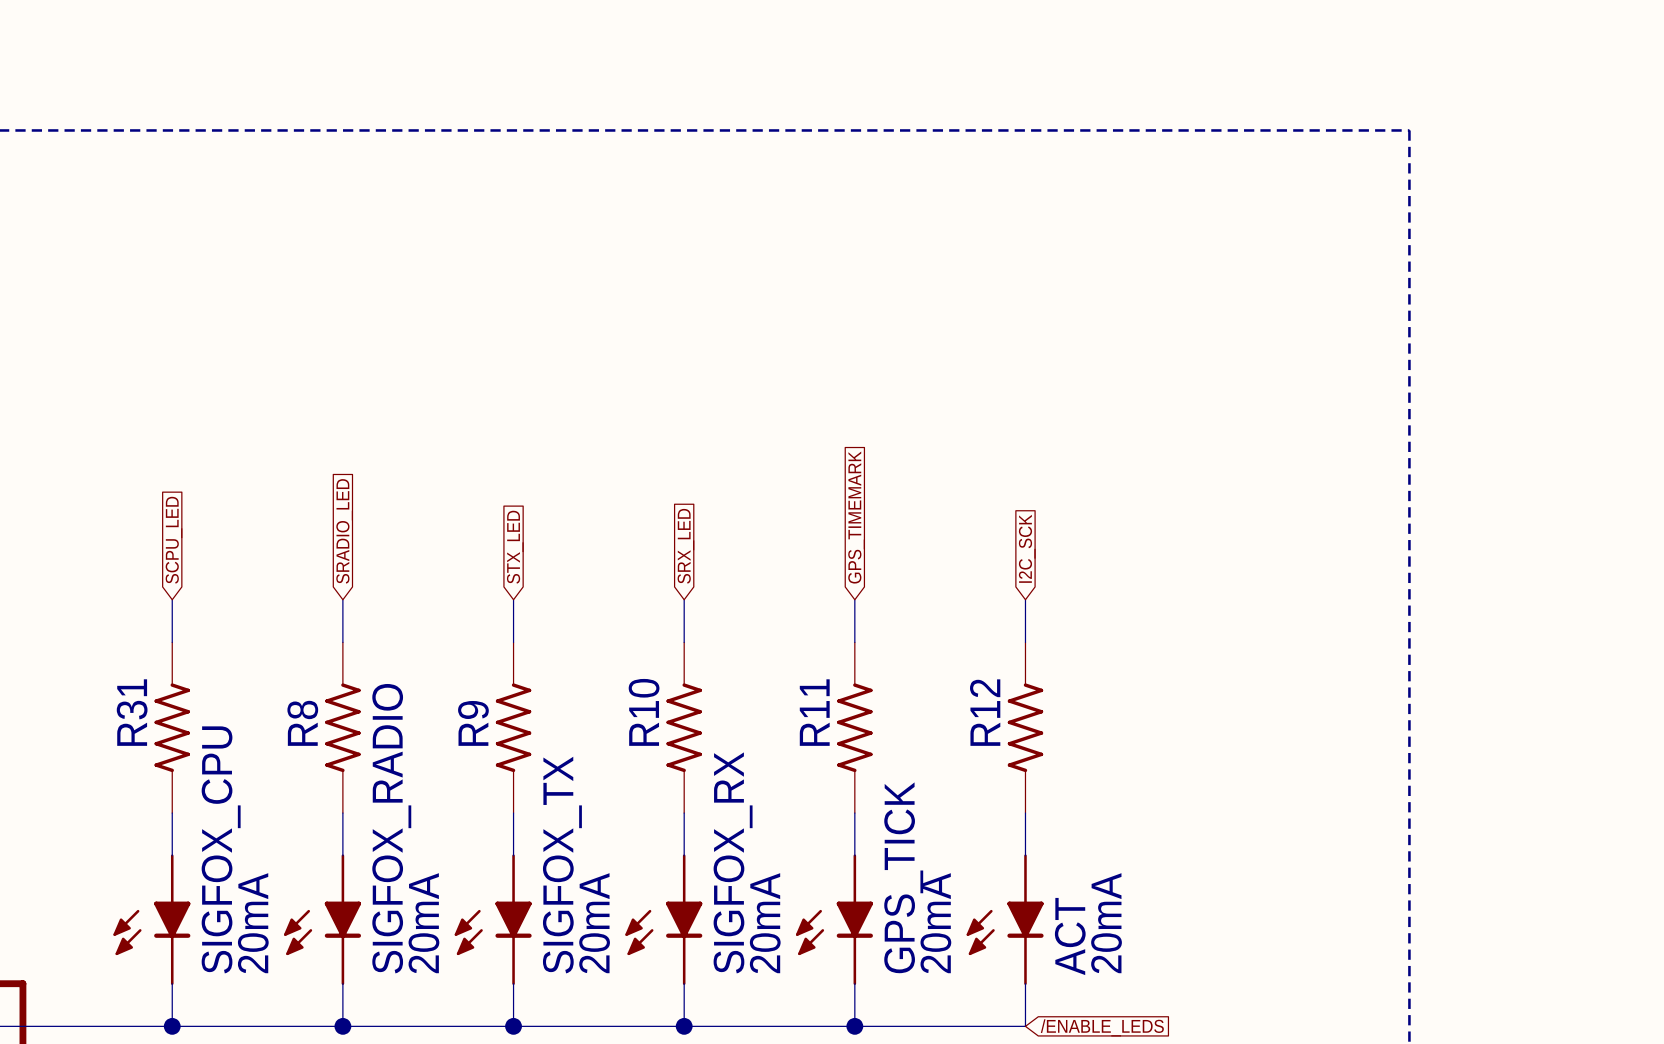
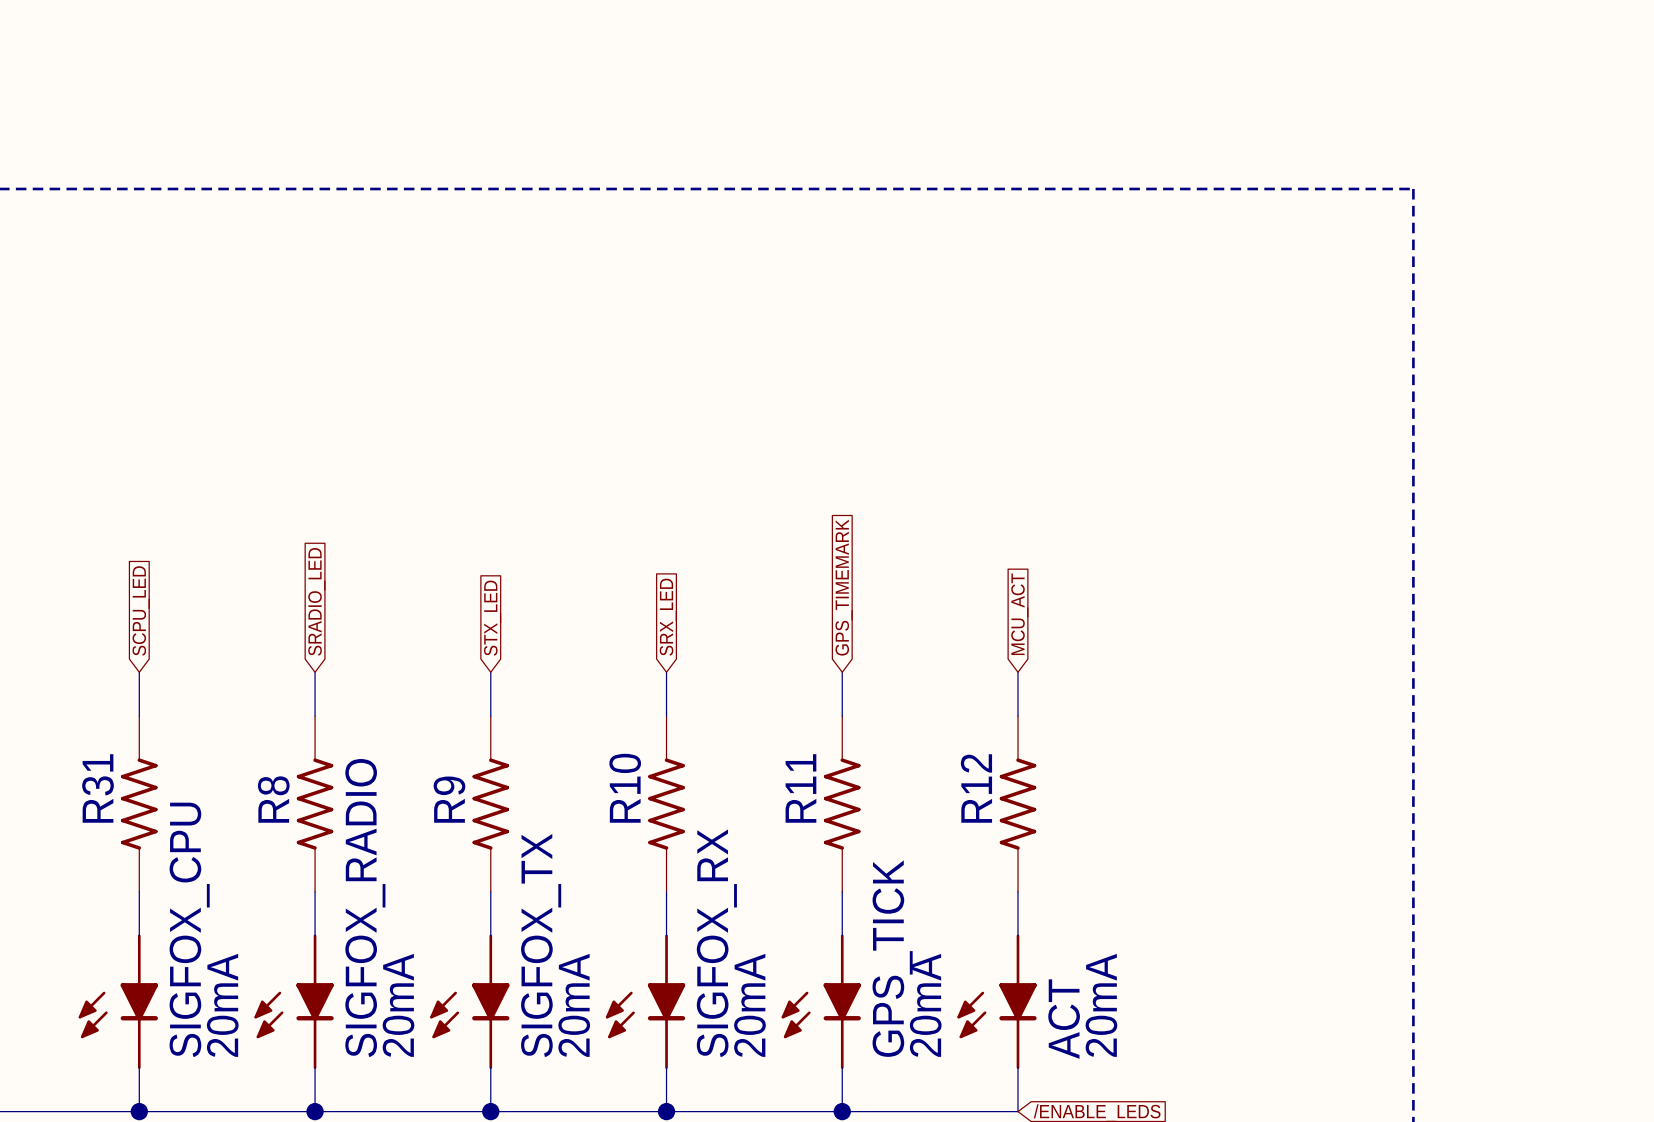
global label: I2C_SCK (1027, 548) -> MCU_ACT (1019, 614)

